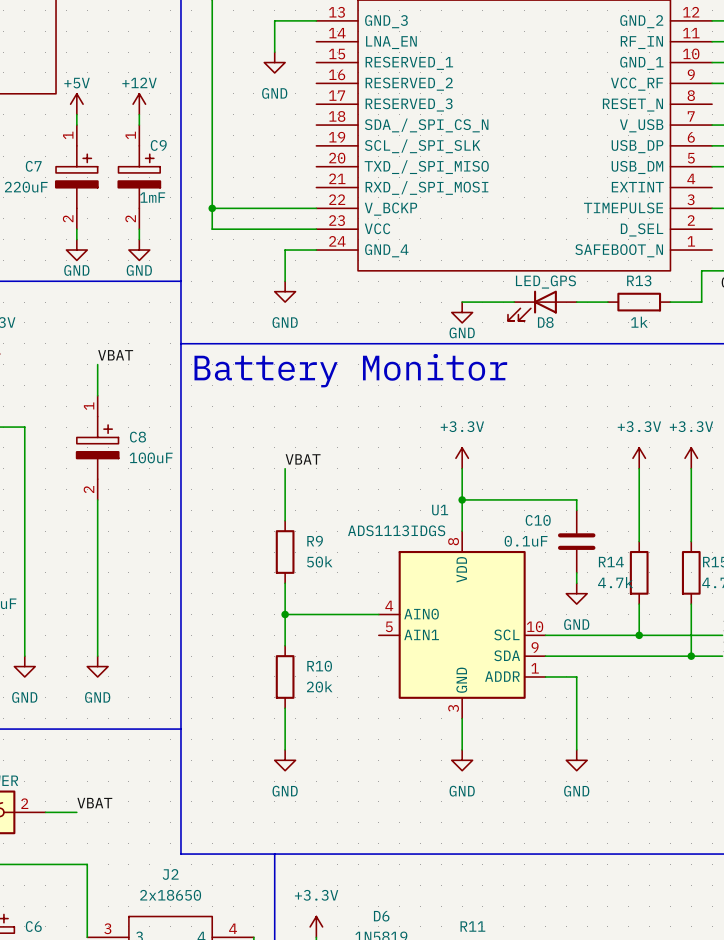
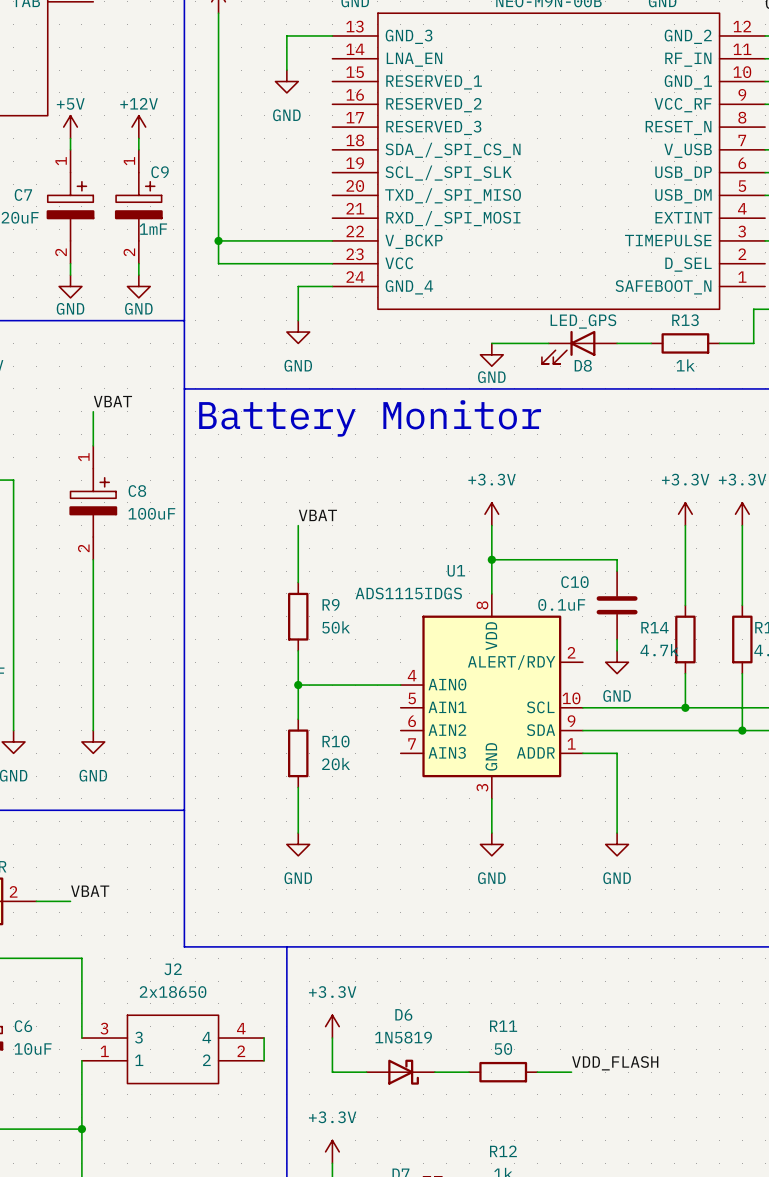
U1 value: ADS1113IDGS (396, 530) -> ADS1115IDGS (408, 593)
U1 symbol: [378, 531, 546, 719] -> [400, 593, 583, 799]

